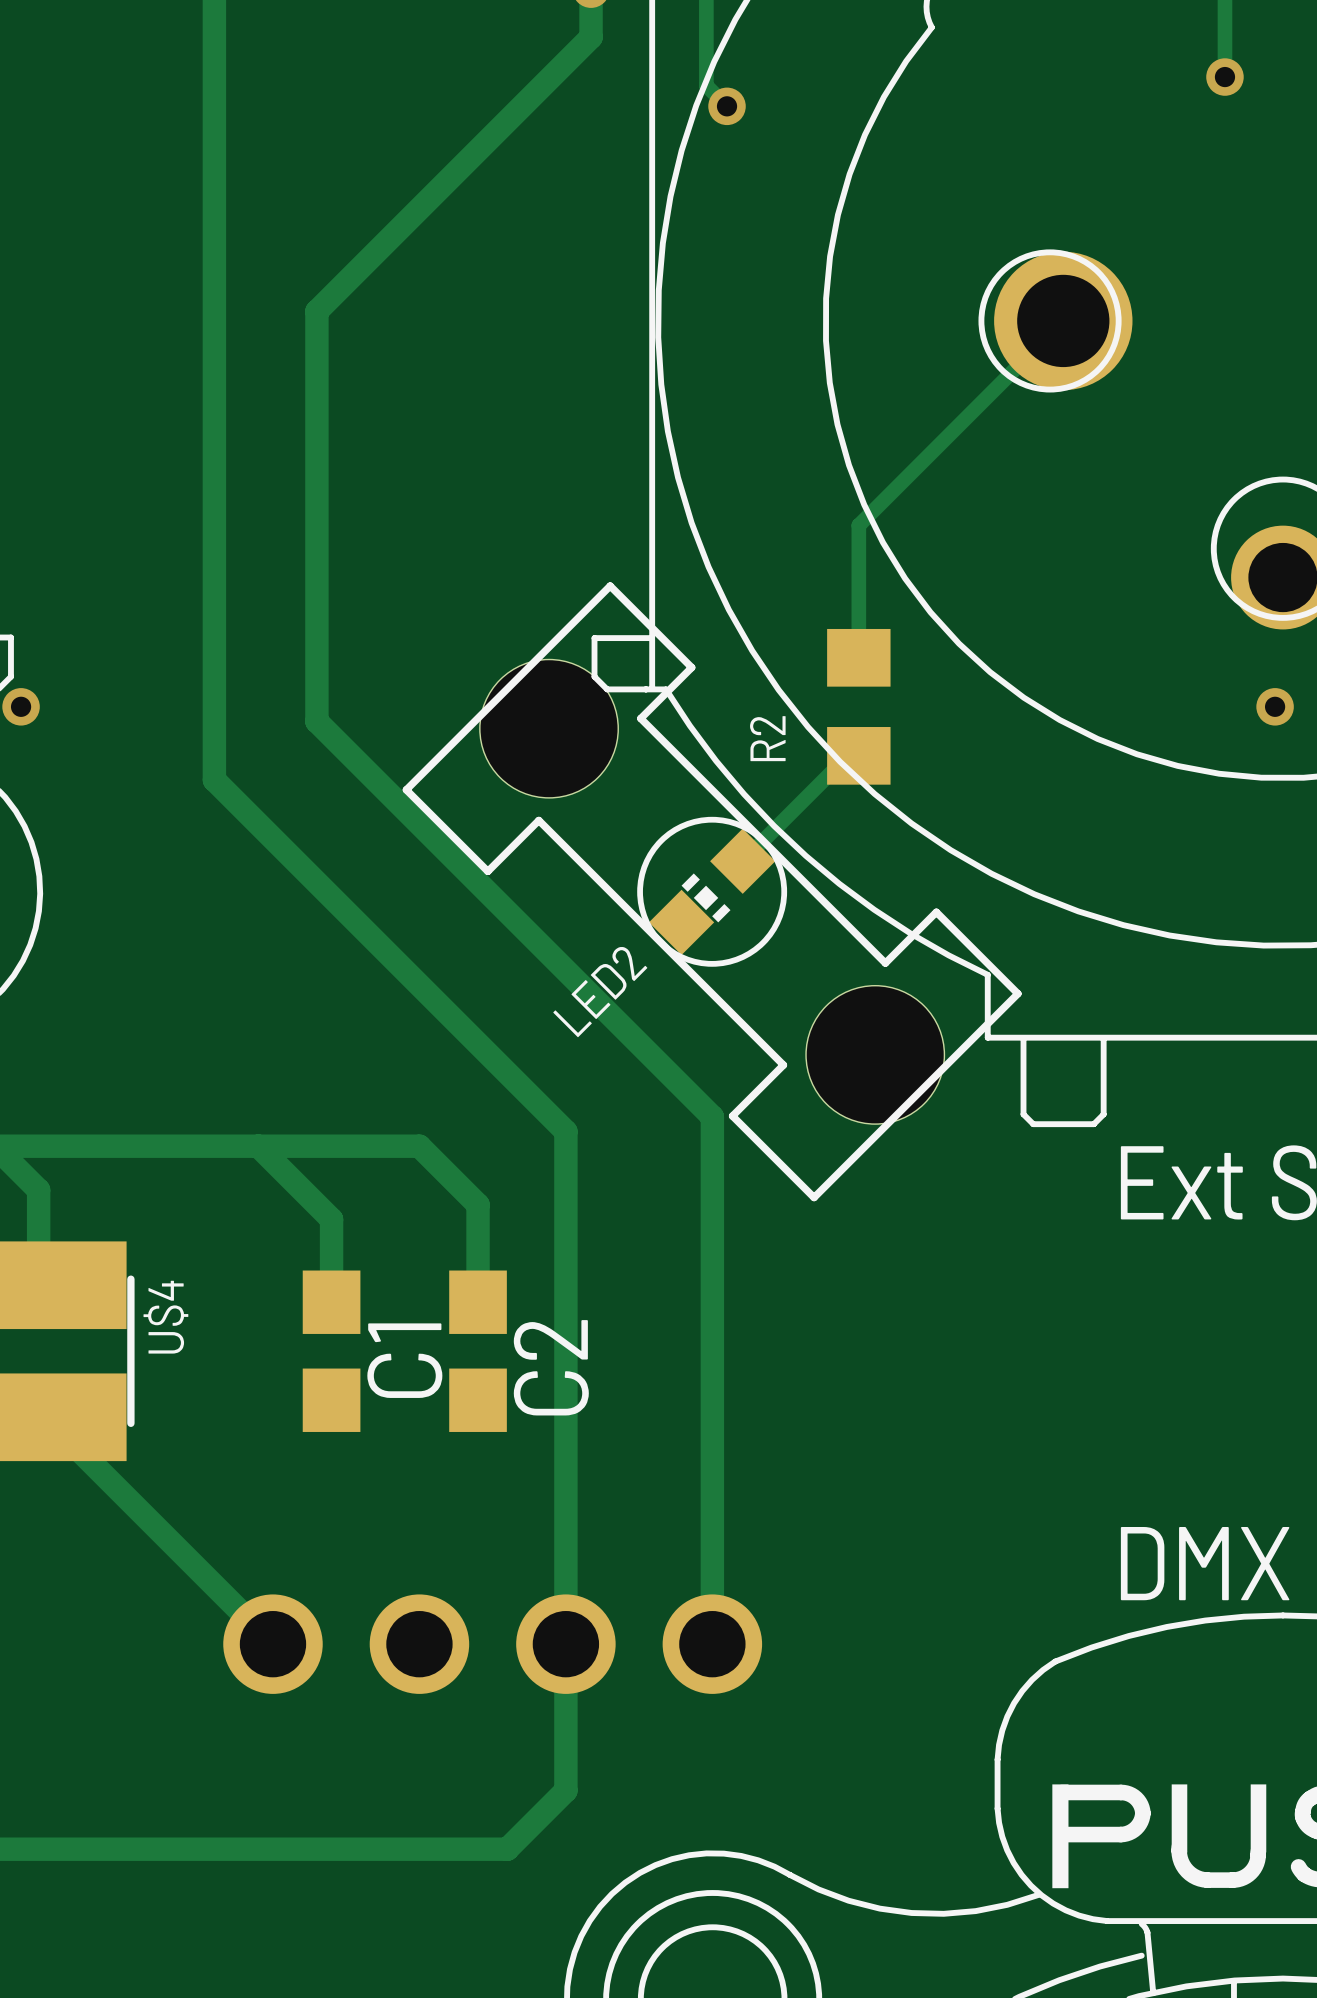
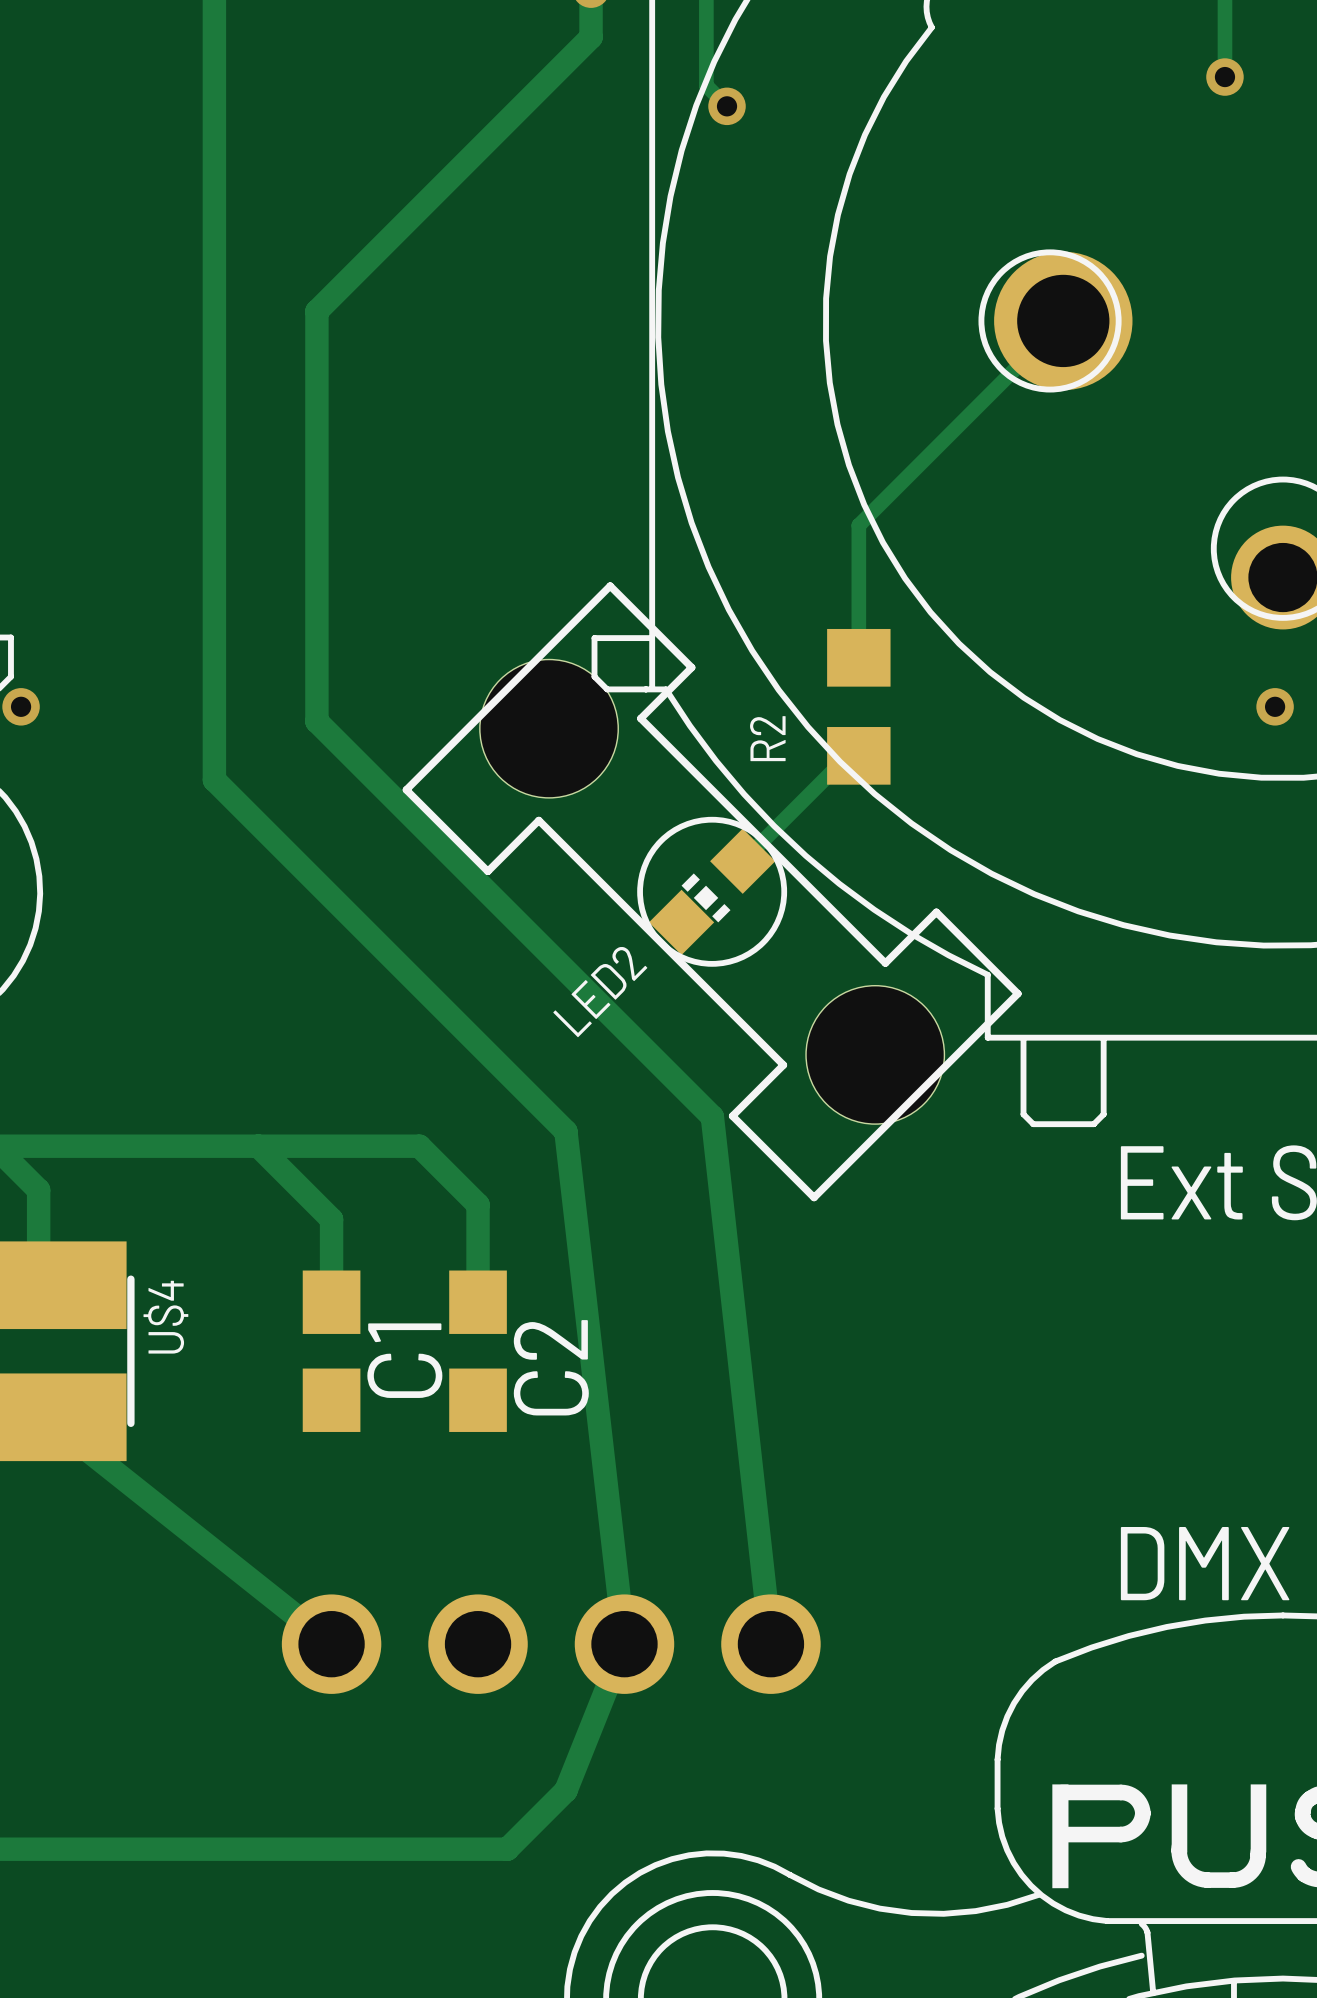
track: (712, 1116) (712, 1644) -> (712, 1116) (770, 1644)
track: (565, 1131) (565, 1790) -> (565, 1131) (624, 1644) (565, 1790)
track: (46, 1417) (272, 1644) -> (46, 1417) (331, 1644)
part position: (492, 1644) -> (551, 1644)

